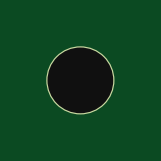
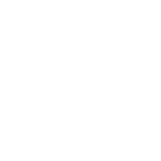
part: (80, 80) -> none

